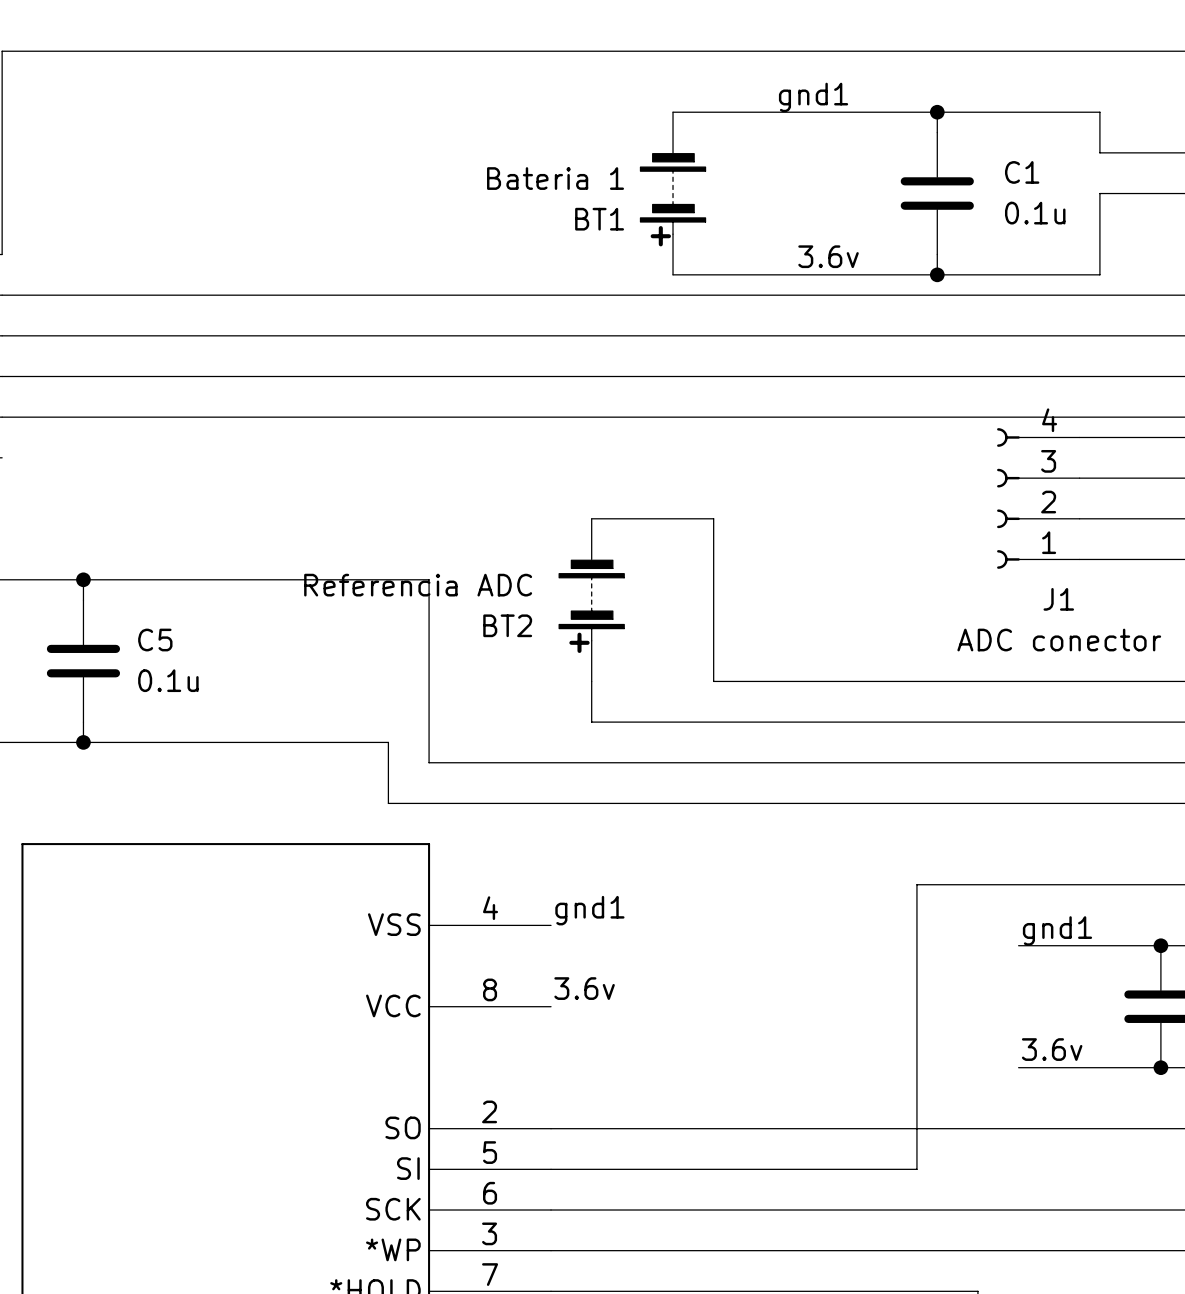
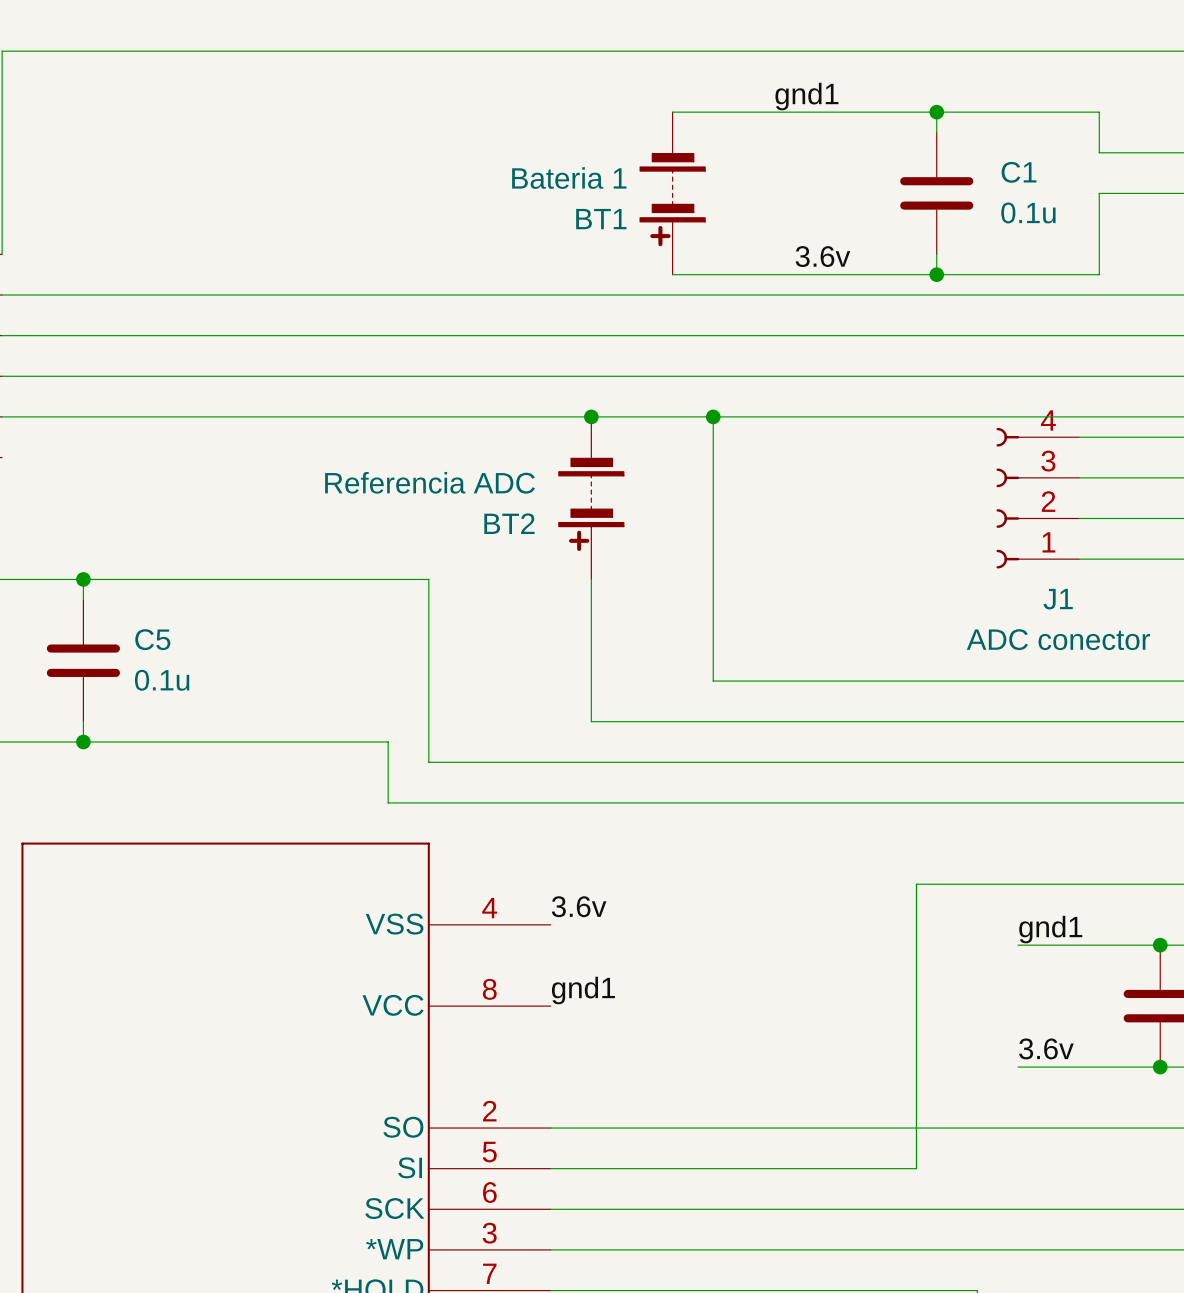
junction: none -> (591, 416)
junction: none -> (713, 416)
wire: (591, 518) (713, 518) -> (713, 416) (713, 518)
BT2 position: (591, 600) -> (591, 498)
label: gnd1 (589, 910) -> 3.6v (579, 906)
label: 3.6v (584, 988) -> gnd1 (583, 990)

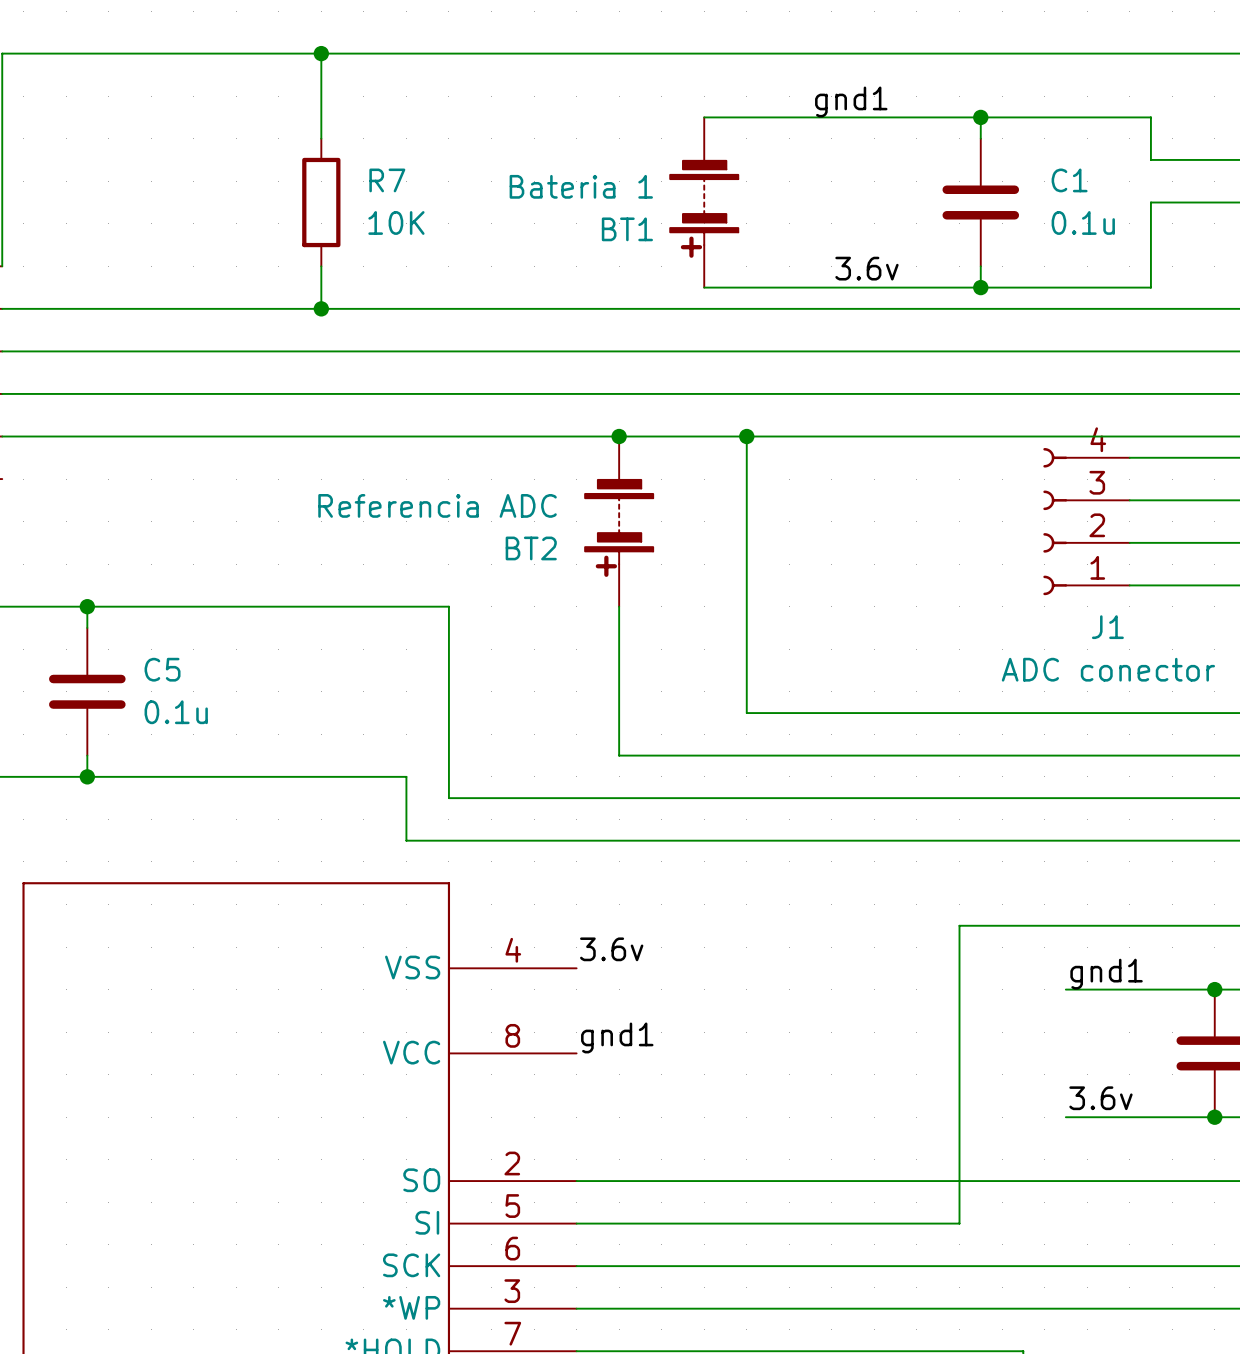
wire: none -> (321, 53) (321, 138)
junction: none -> (321, 53)
R7: none -> 10K (321, 202)
wire: none -> (321, 266) (321, 308)
junction: none -> (321, 308)

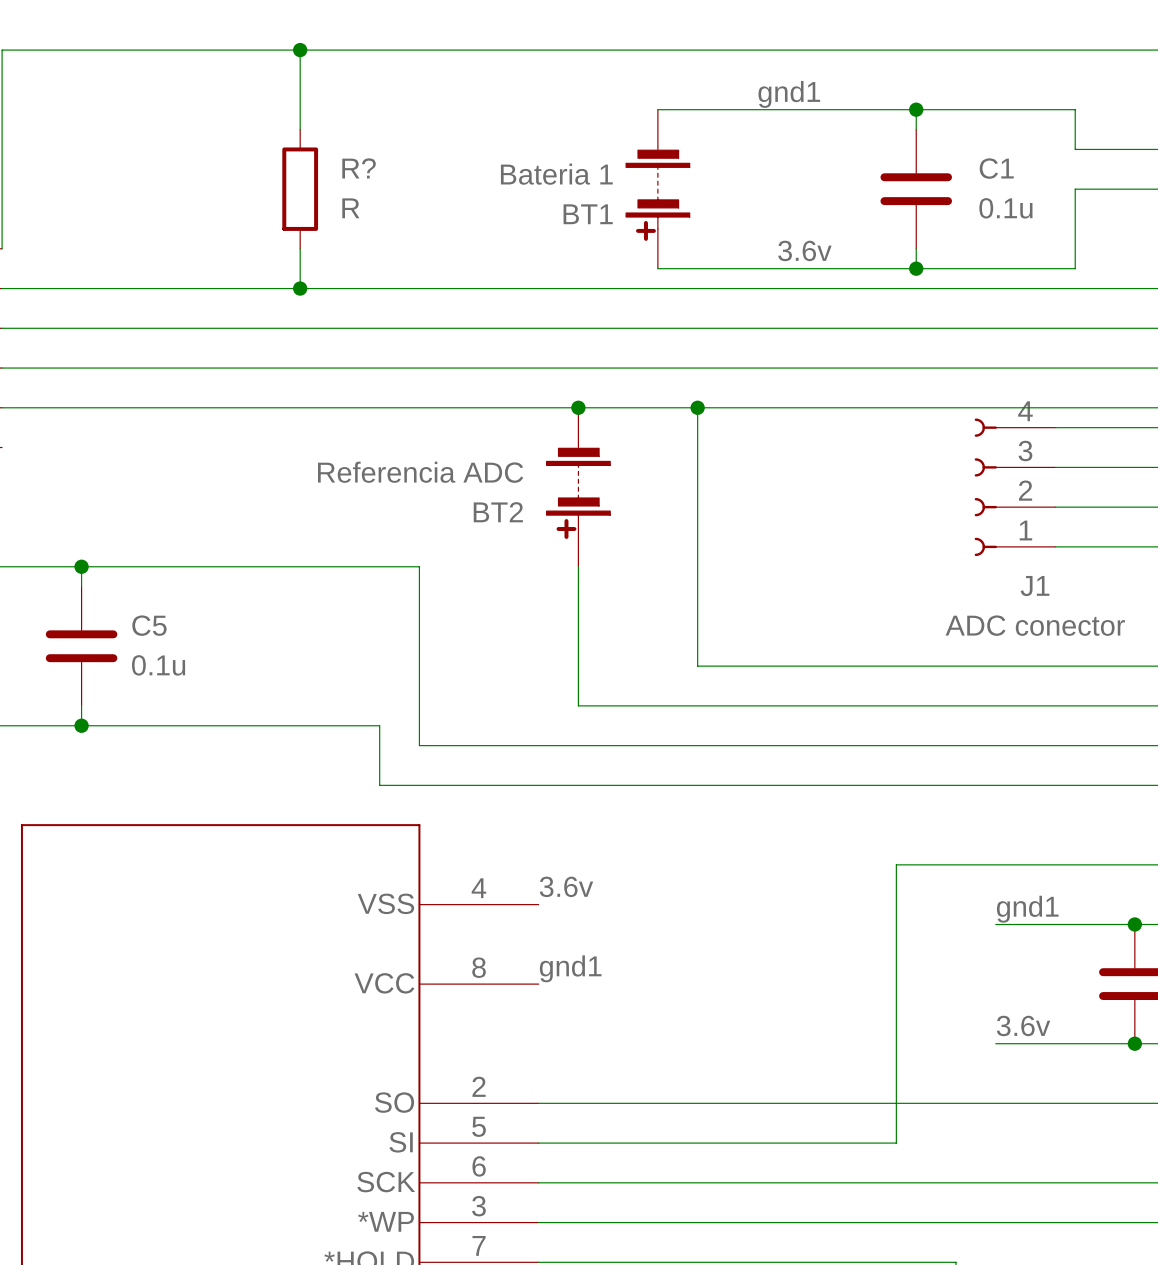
R7 name: R7 (387, 180) -> R? (359, 168)
R7 value: 10K (396, 222) -> R (350, 208)

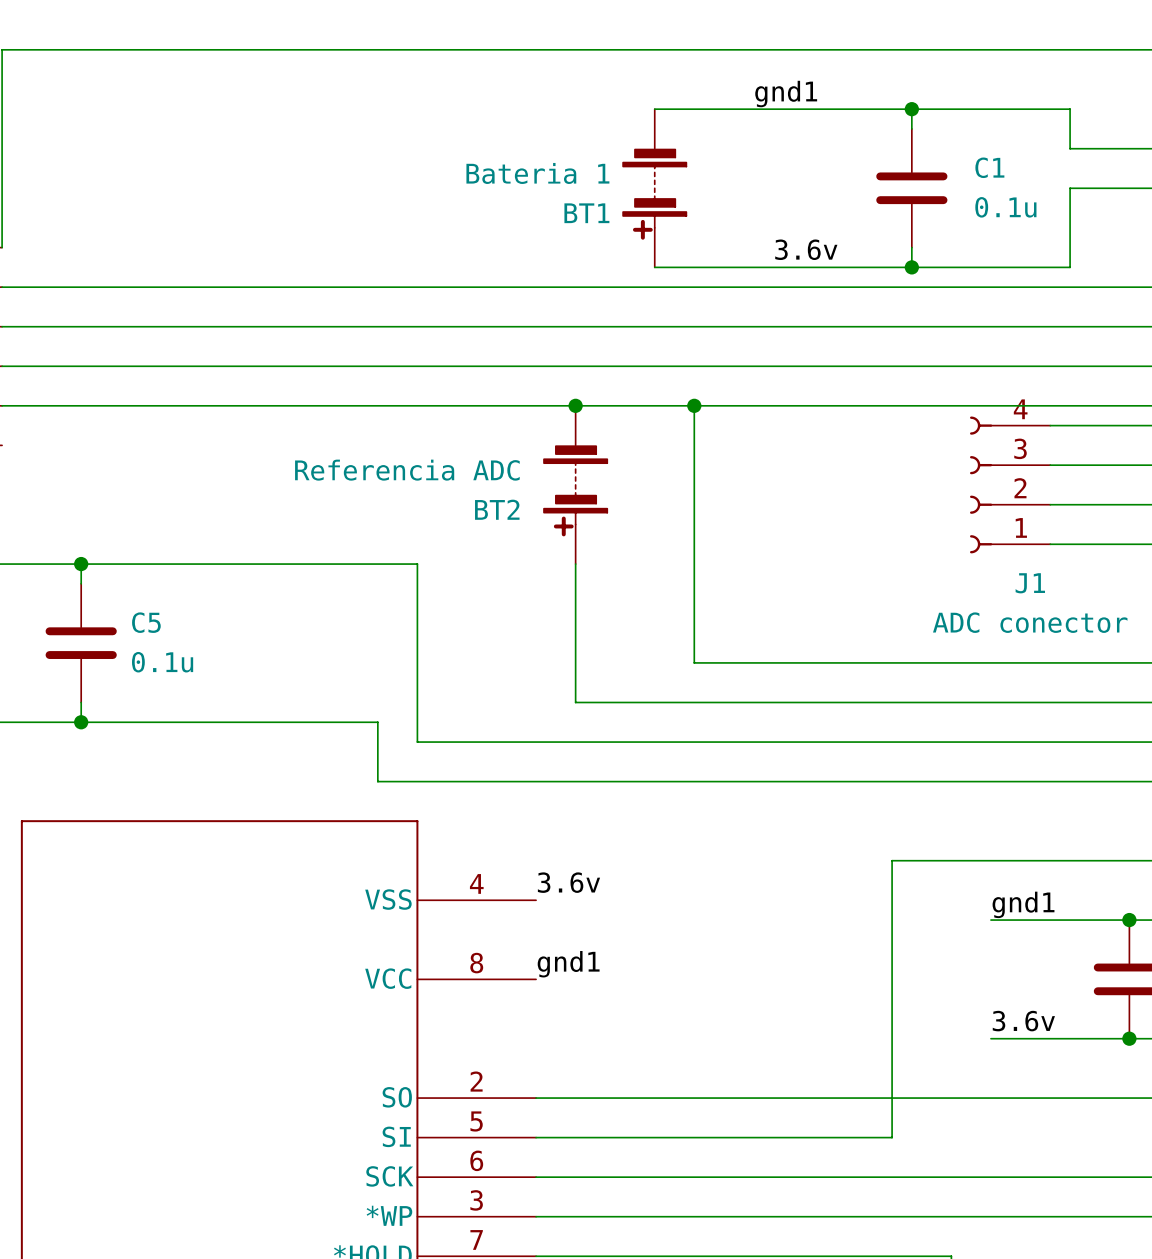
wire: (300, 50) (300, 129) -> none
junction: (300, 50) -> none
R?: R (300, 189) -> none
wire: (300, 248) (300, 288) -> none
junction: (300, 288) -> none

